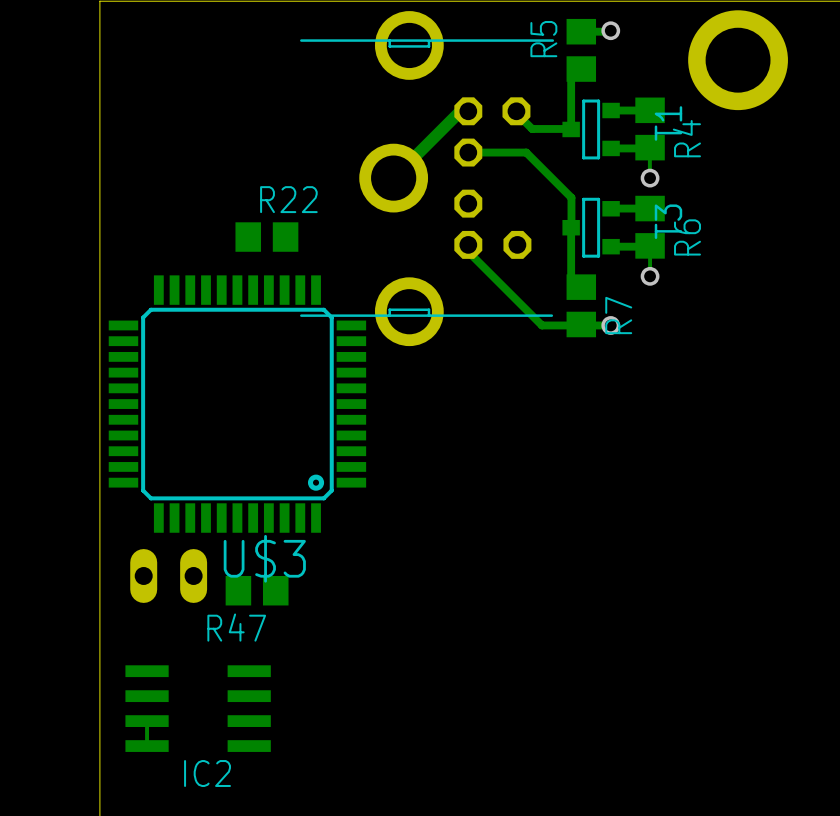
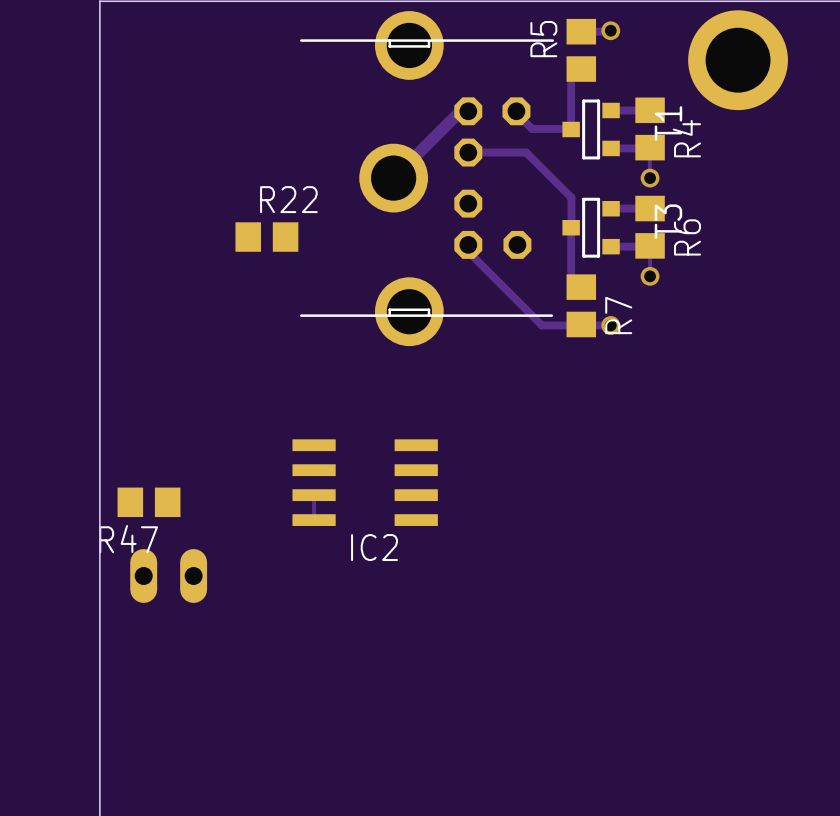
U$3: (237, 404) -> none
R47 position: (257, 590) -> (149, 502)
IC2 position: (198, 708) -> (365, 482)
track: (147, 721) (147, 746) -> (314, 495) (314, 520)

